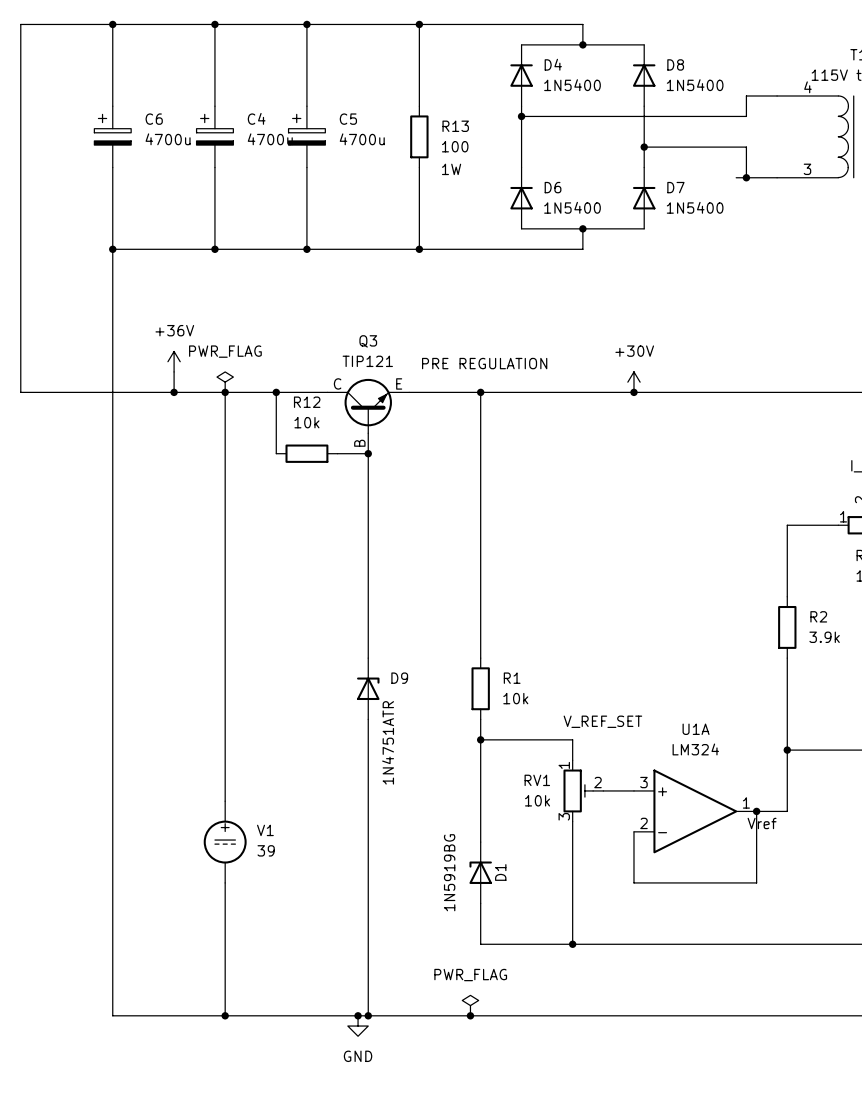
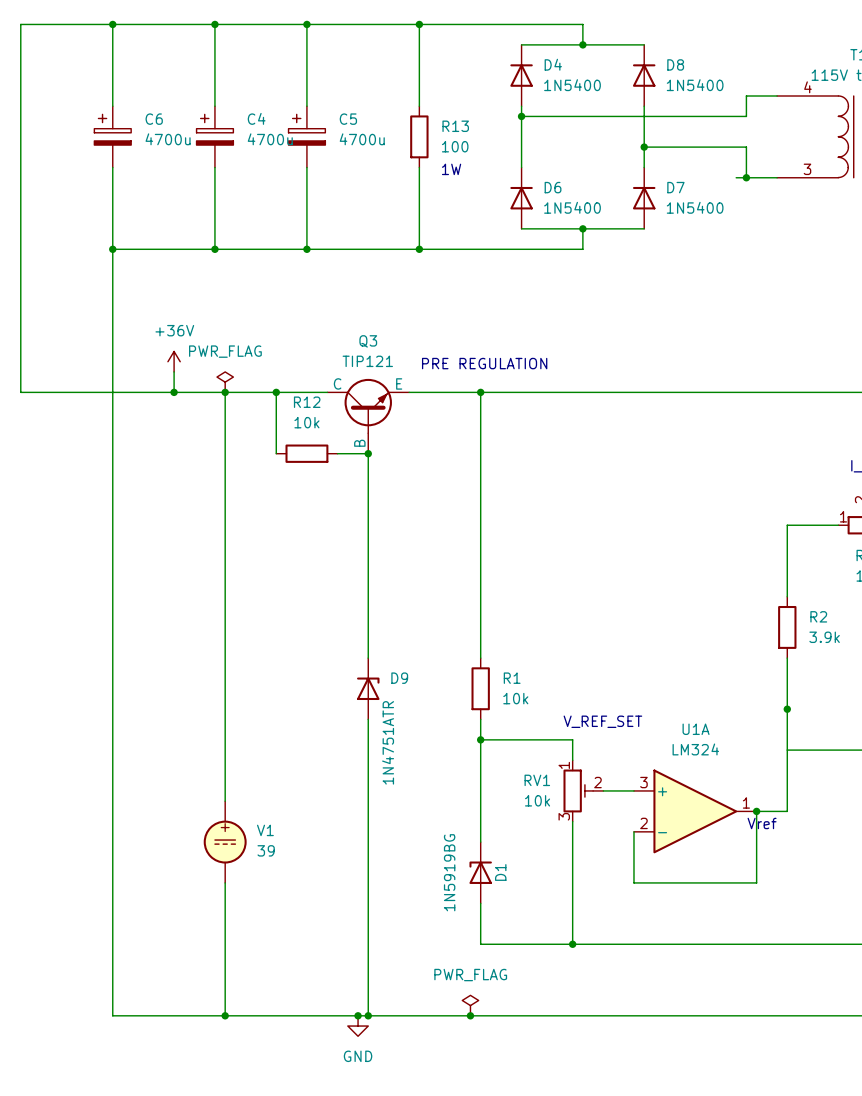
power symbol: +30V (633, 382) -> none
junction: (633, 392) -> none
junction position: (787, 750) -> (787, 709)

